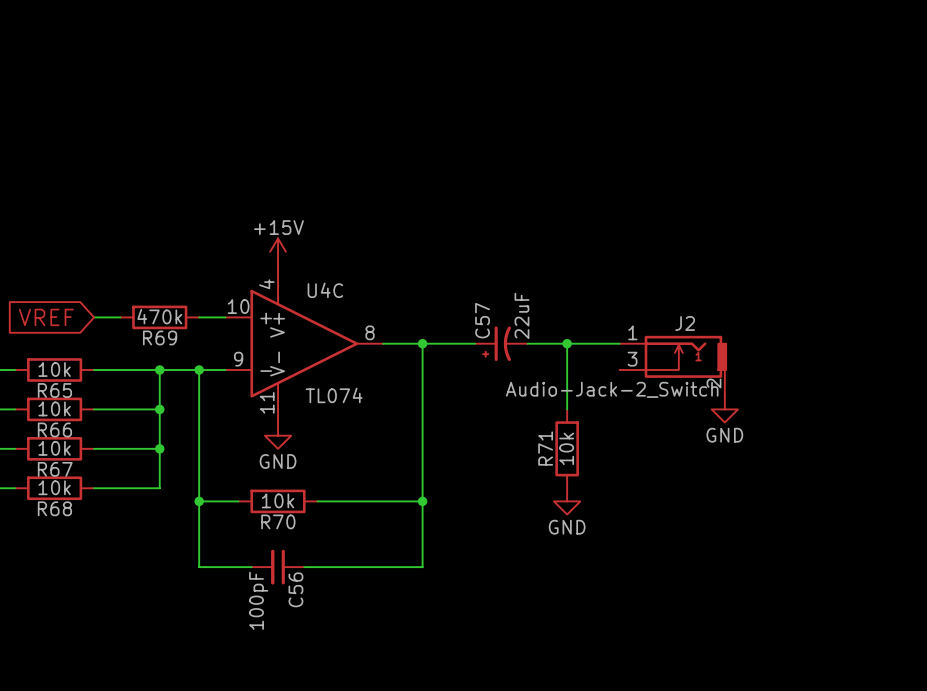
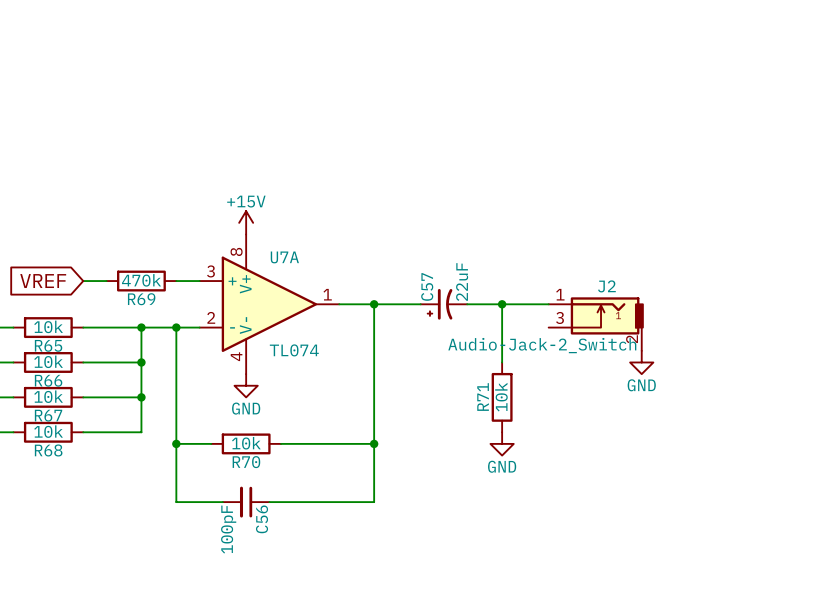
U4C pin number: 4 (266, 284) -> 8 (236, 251)
U4C name: U4C (325, 290) -> U7A (284, 257)
U4C pin number: 10 (238, 306) -> 3 (210, 271)
U4C pin number: 8 (370, 332) -> 1 (327, 294)
U4C pin number: 9 (238, 359) -> 2 (211, 317)
U4C pin number: 11 (267, 402) -> 4 (236, 356)

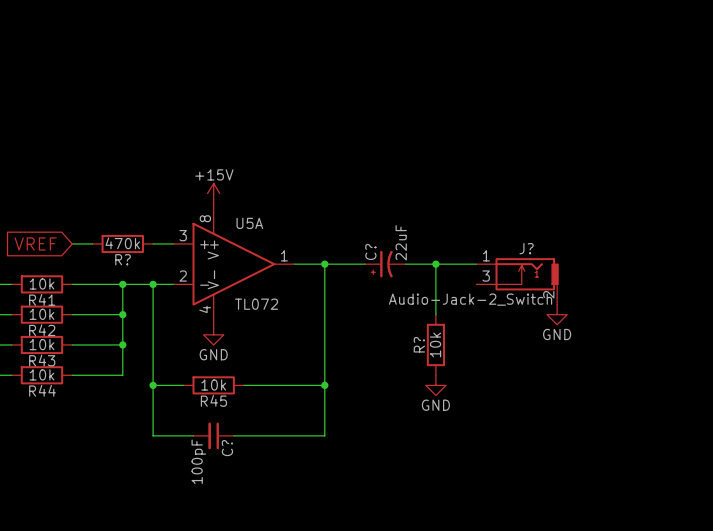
U7A name: U7A (284, 257) -> U5A (249, 223)
C57 name: C57 (427, 286) -> C? (370, 251)
J2 name: J2 (606, 286) -> J? (526, 248)
R69 name: R69 (141, 299) -> R? (123, 259)
R65 name: R65 (48, 345) -> R41 (42, 299)
U7A value: TL074 (294, 350) -> TL072 (256, 304)
R66 name: R66 (48, 380) -> R42 (42, 330)
R71 name: R71 (483, 397) -> R? (419, 344)
R67 name: R67 (48, 415) -> R43 (42, 360)
R68 name: R68 (48, 450) -> R44 (42, 390)
R70 name: R70 (246, 462) -> R45 (213, 400)
C56 name: C56 (262, 519) -> C? (227, 448)

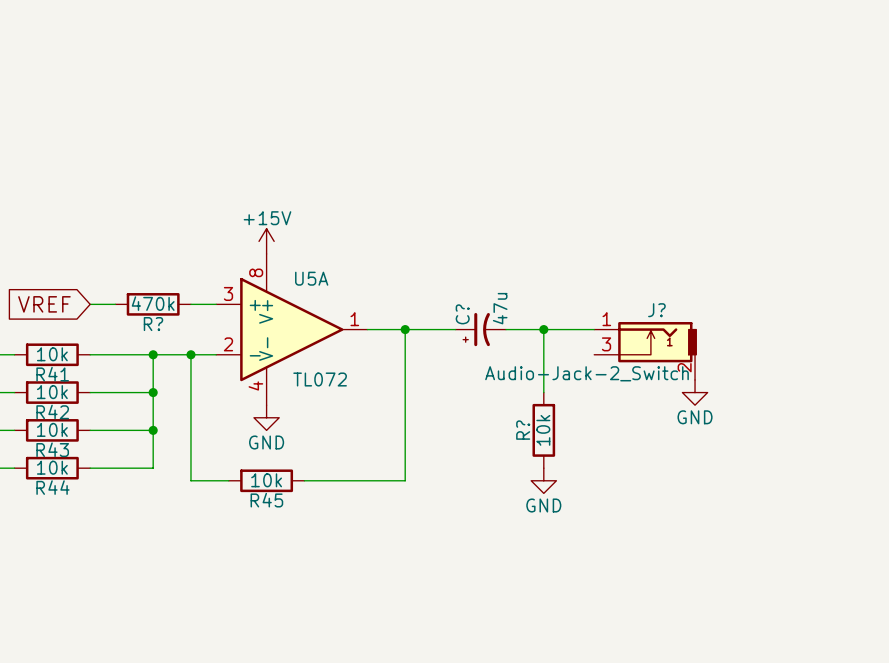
C? value: 22uF (401, 242) -> 47u (500, 308)
wire: (153, 385) (153, 435) (193, 435) -> none
junction: (153, 385) -> none
wire: (324, 385) (324, 435) (233, 435) -> none
junction: (324, 385) -> none
C?: 100pF (213, 435) -> none

